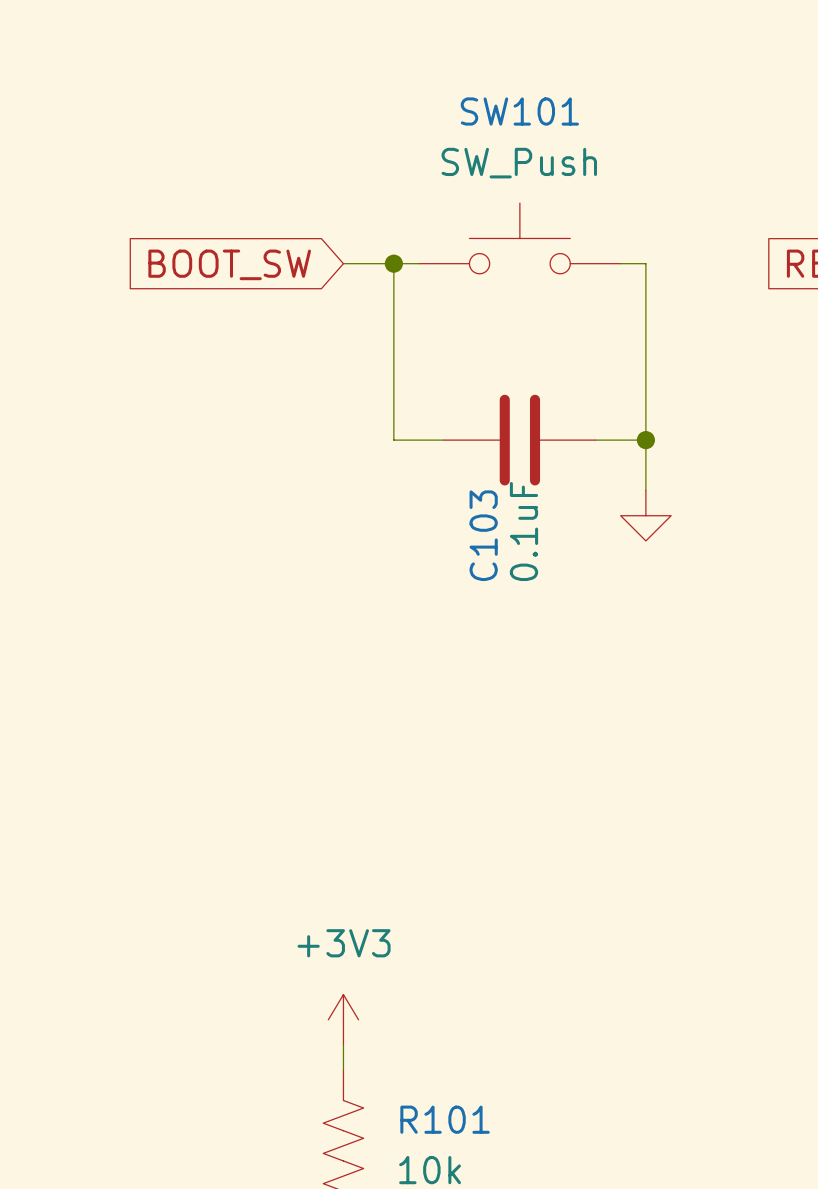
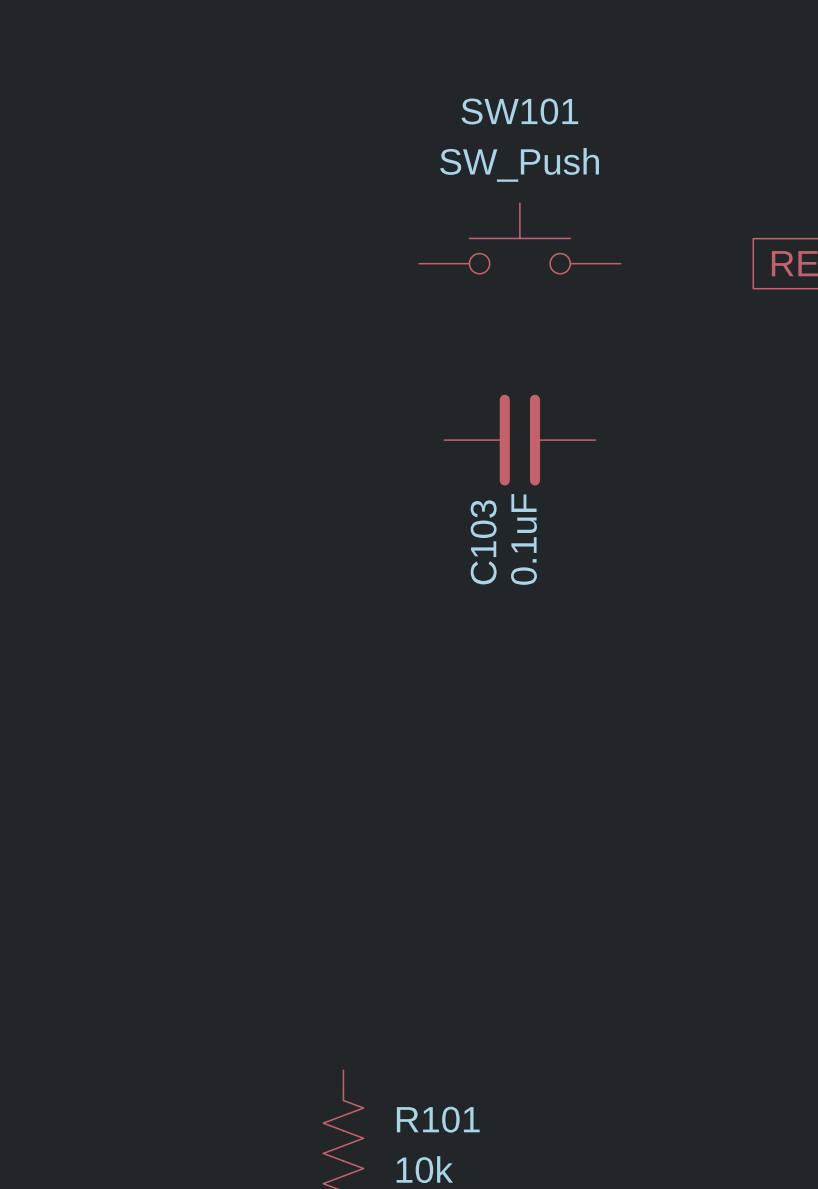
wire: (343, 263) (419, 263) -> none
wire: (393, 263) (393, 440) (444, 440) -> none
junction: (393, 263) -> none
wire: (620, 263) (645, 263) (645, 490) -> none
global label: BOOT_SW (229, 264) -> none
wire: (595, 440) (645, 440) -> none
junction: (645, 440) -> none
power symbol: (645, 515) -> none
power symbol: +3V3 (343, 1019) -> none
wire: (343, 1045) (343, 1070) -> none

